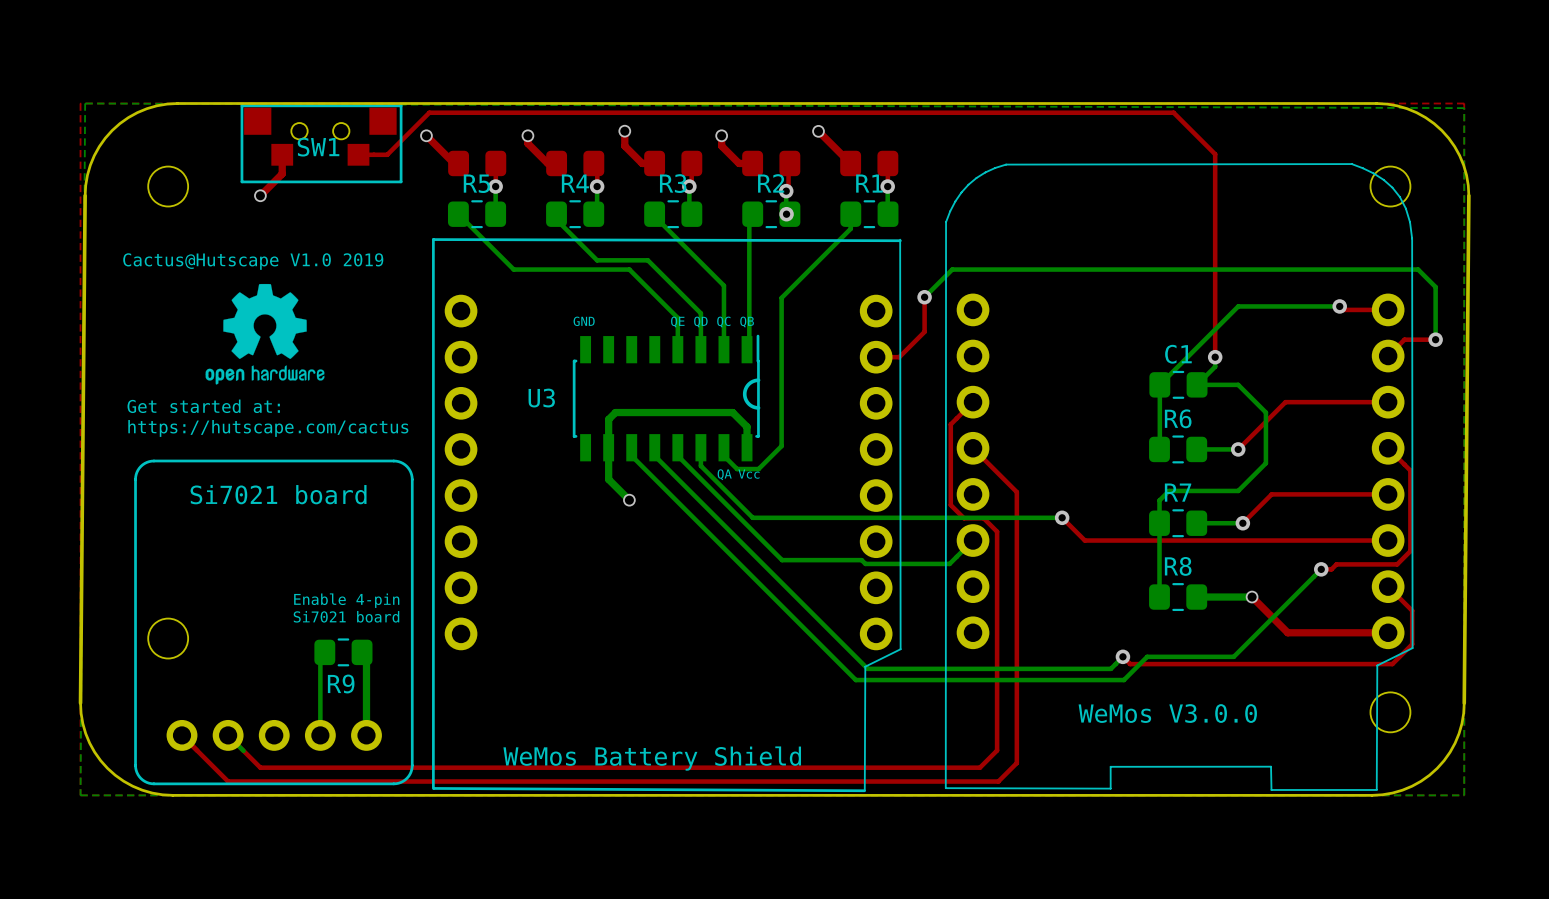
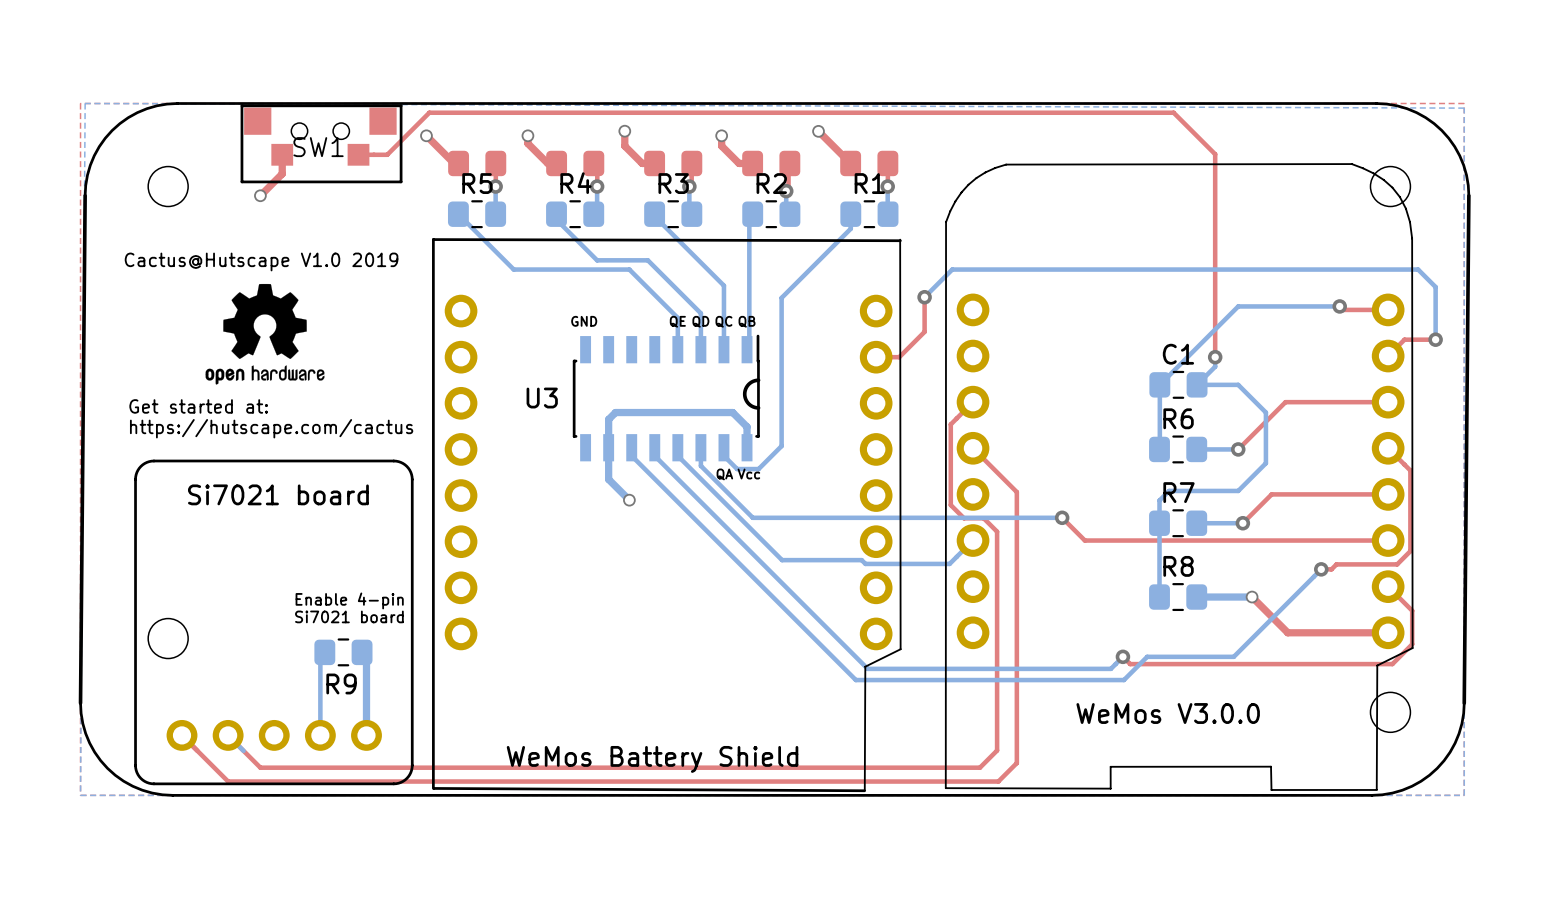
via: (786, 214) -> none

